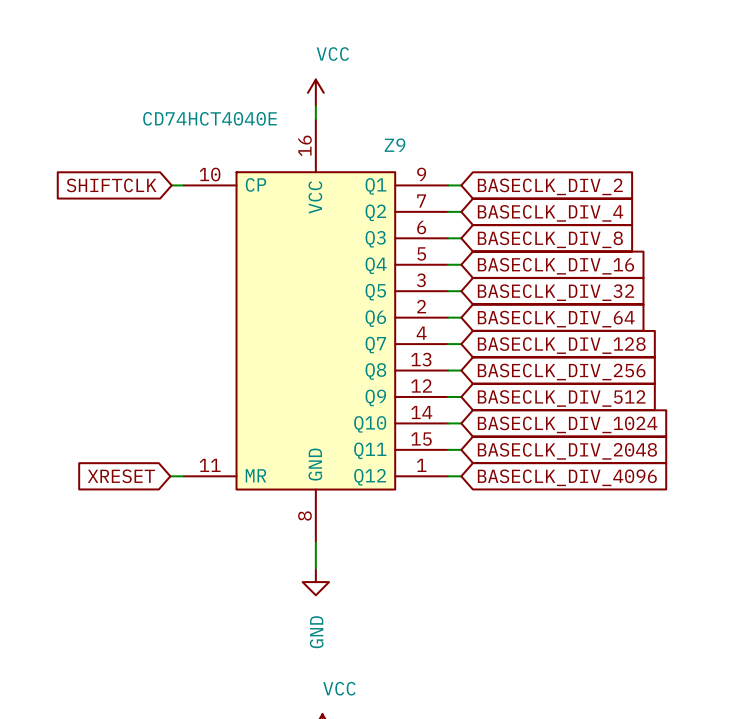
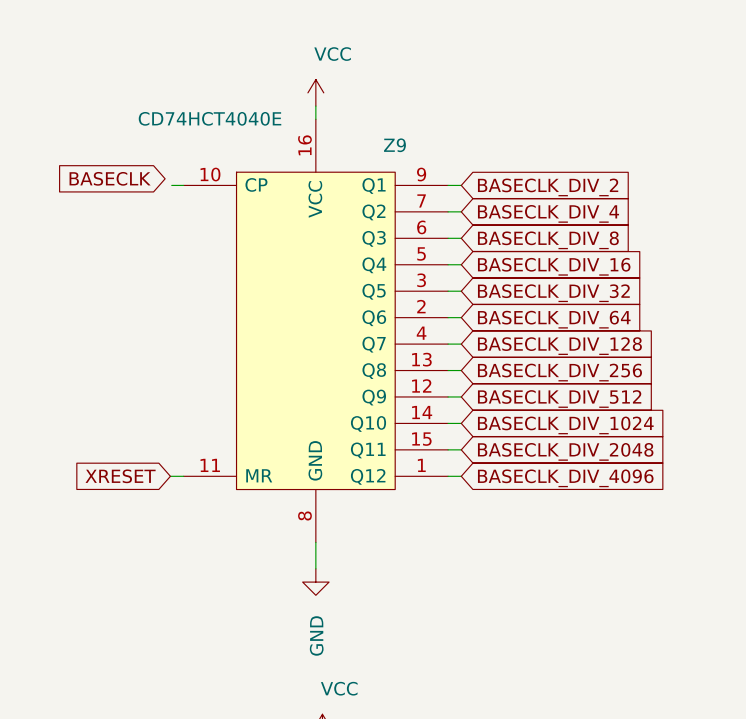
global label: SHIFTCLK (111, 185) -> BASECLK (110, 178)

